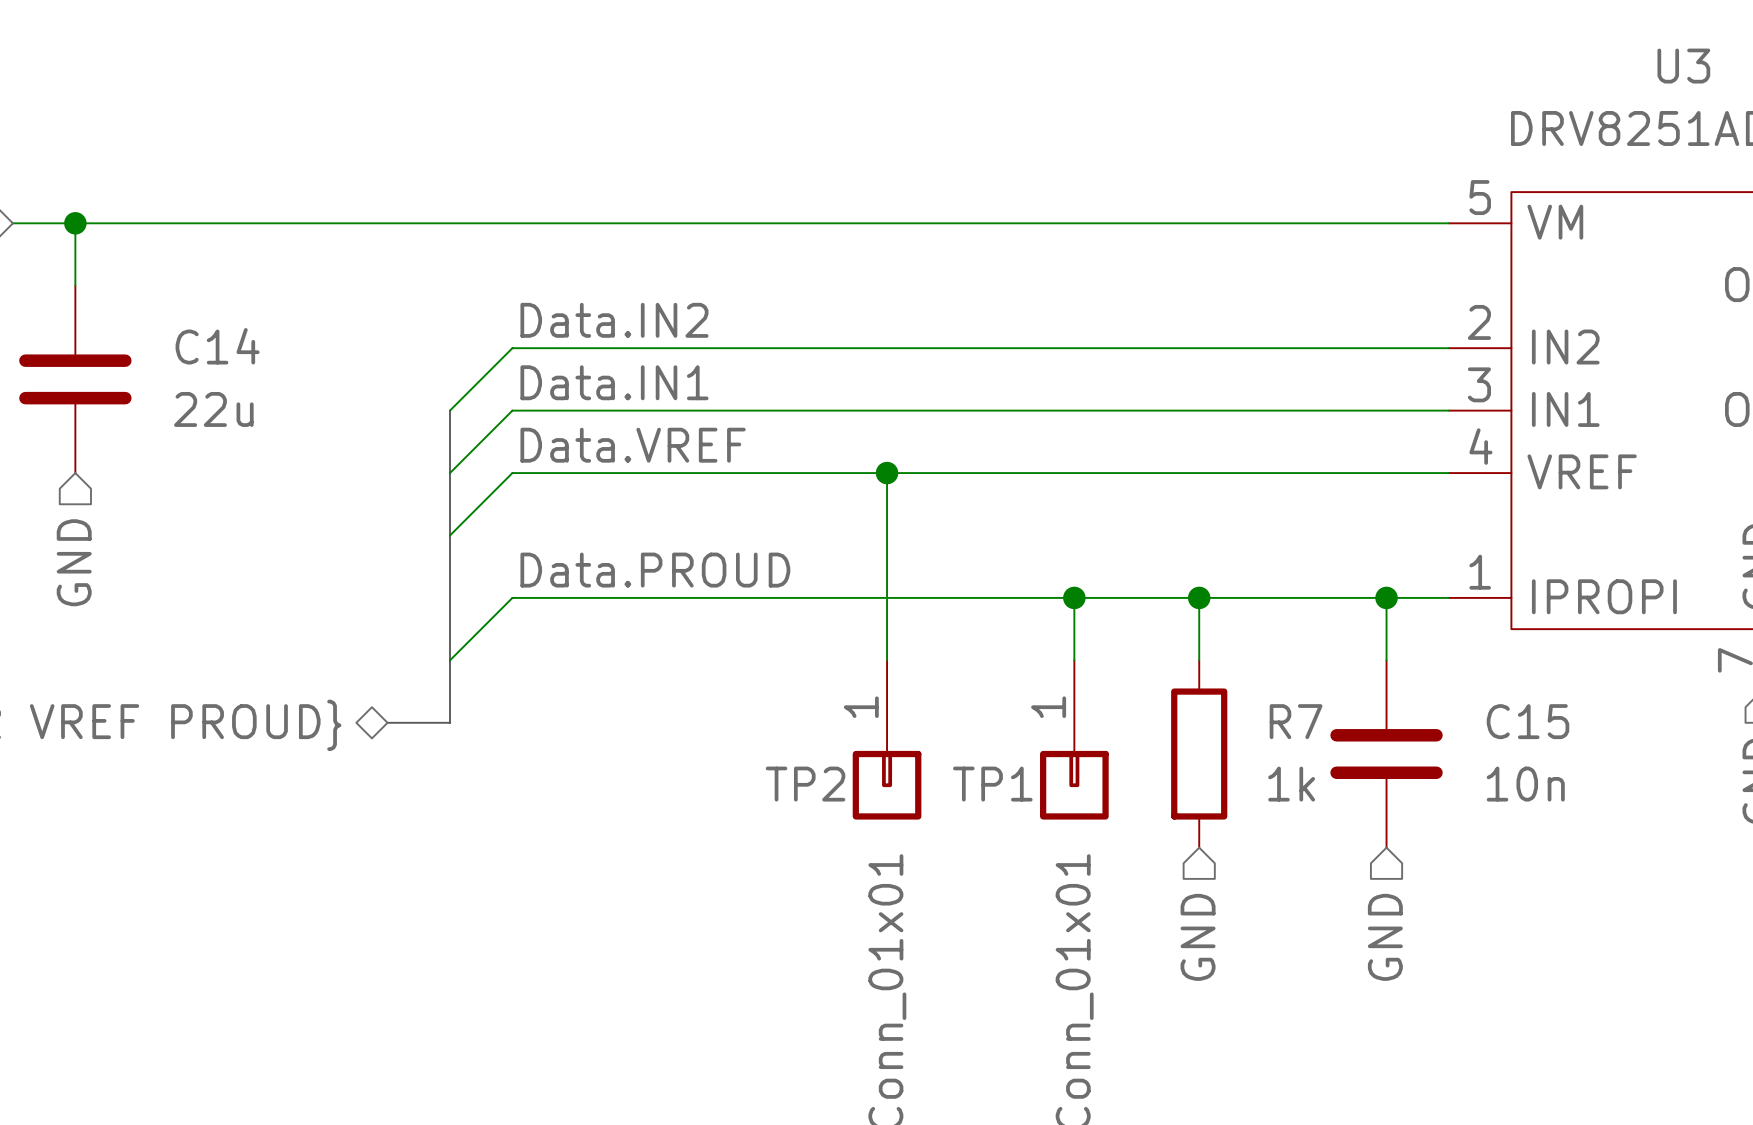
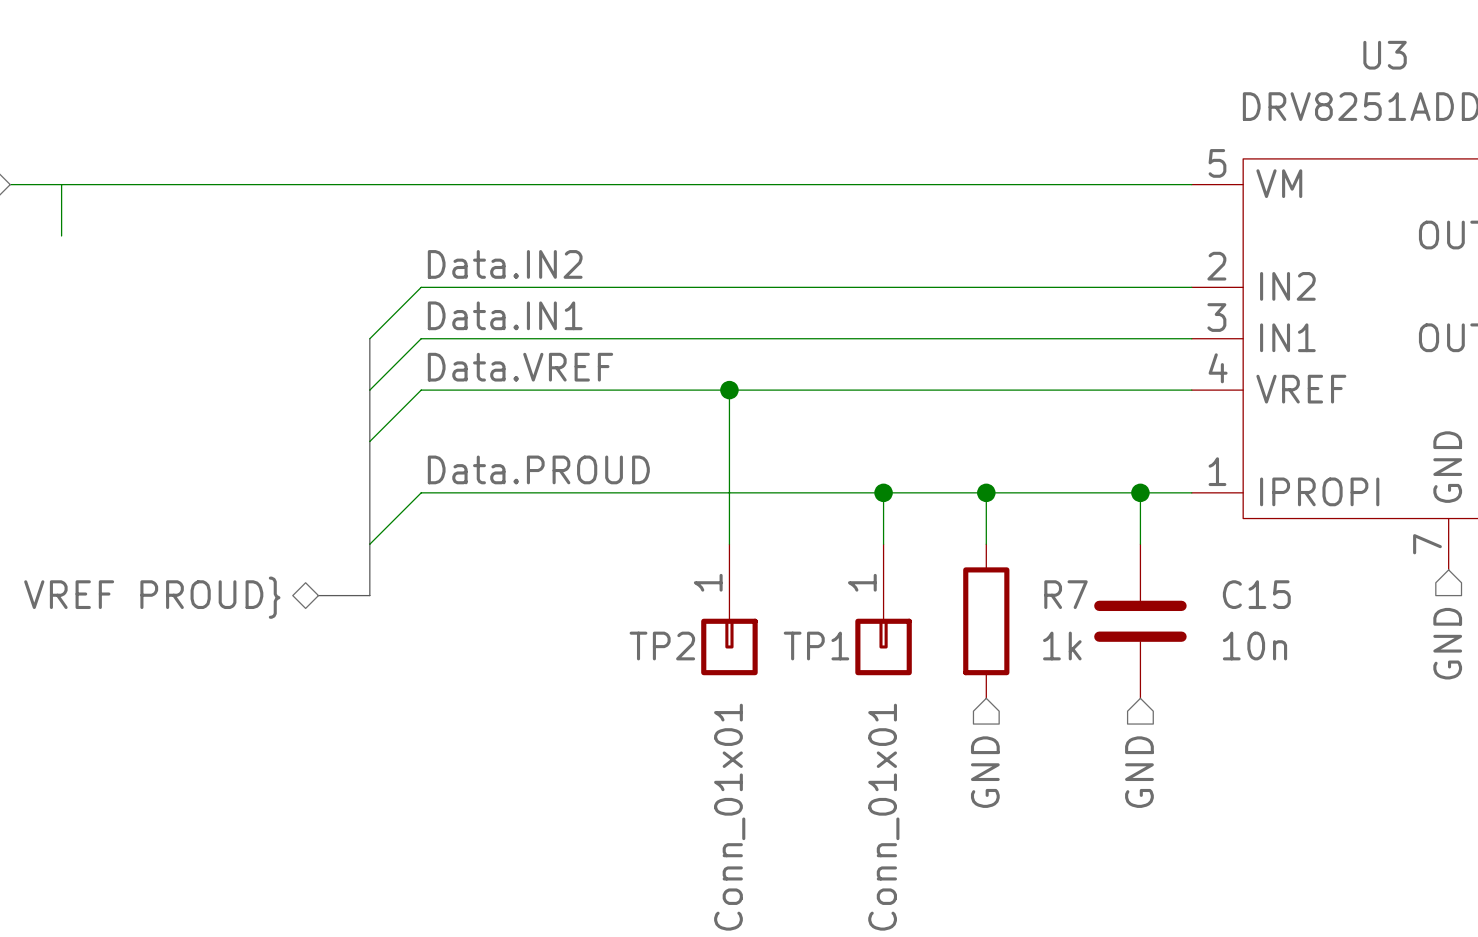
junction: (75, 223) -> none
C14: 22u (75, 379) -> none
hierarchical label: GND (74, 562) -> none

